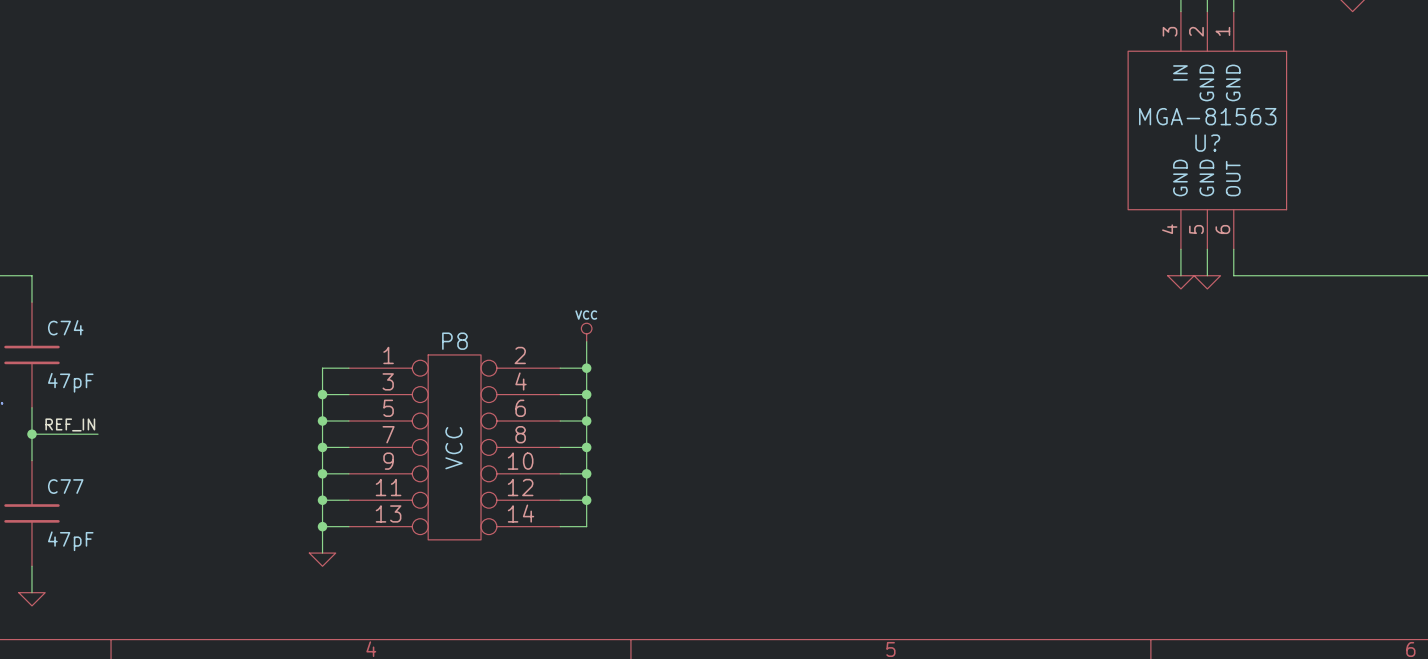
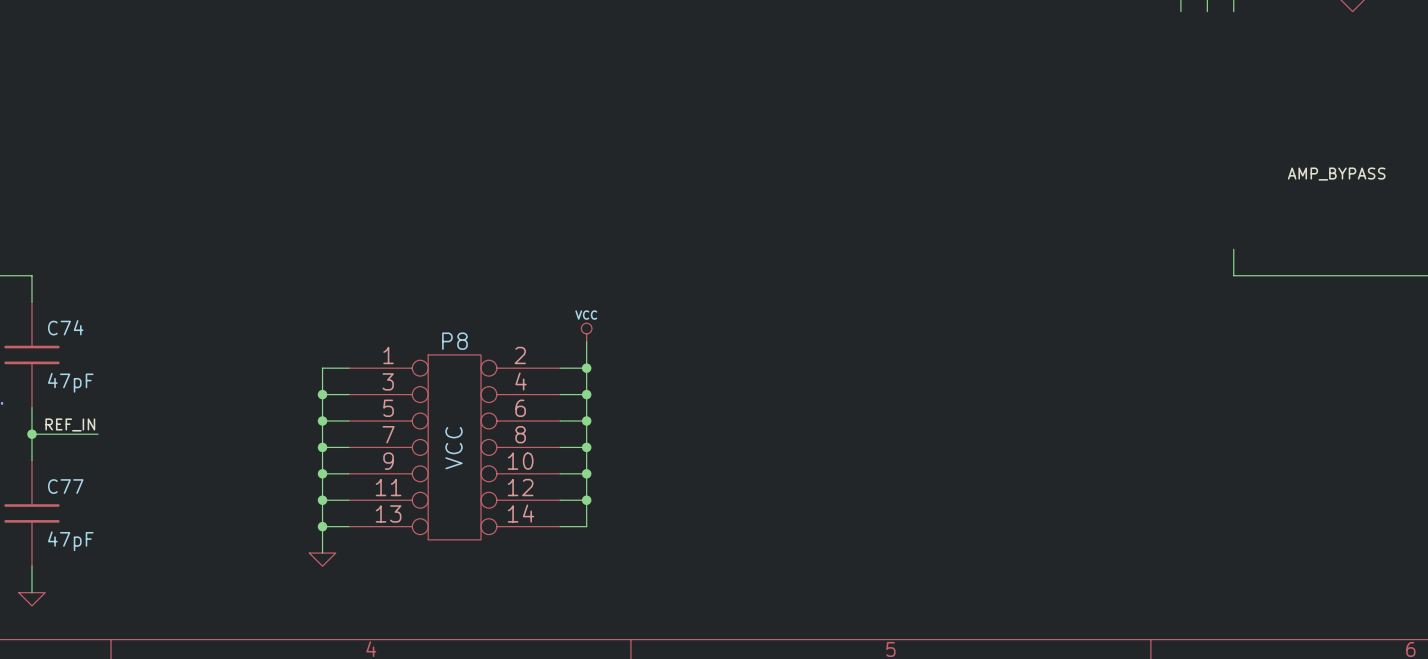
U?: MGA-81563 (1207, 130) -> none
label: none -> AMP_BYPASS (1336, 174)
wire: (1180, 249) (1180, 275) -> none
wire: (1207, 249) (1207, 275) -> none
power symbol: (1180, 282) -> none
power symbol: (1207, 282) -> none

